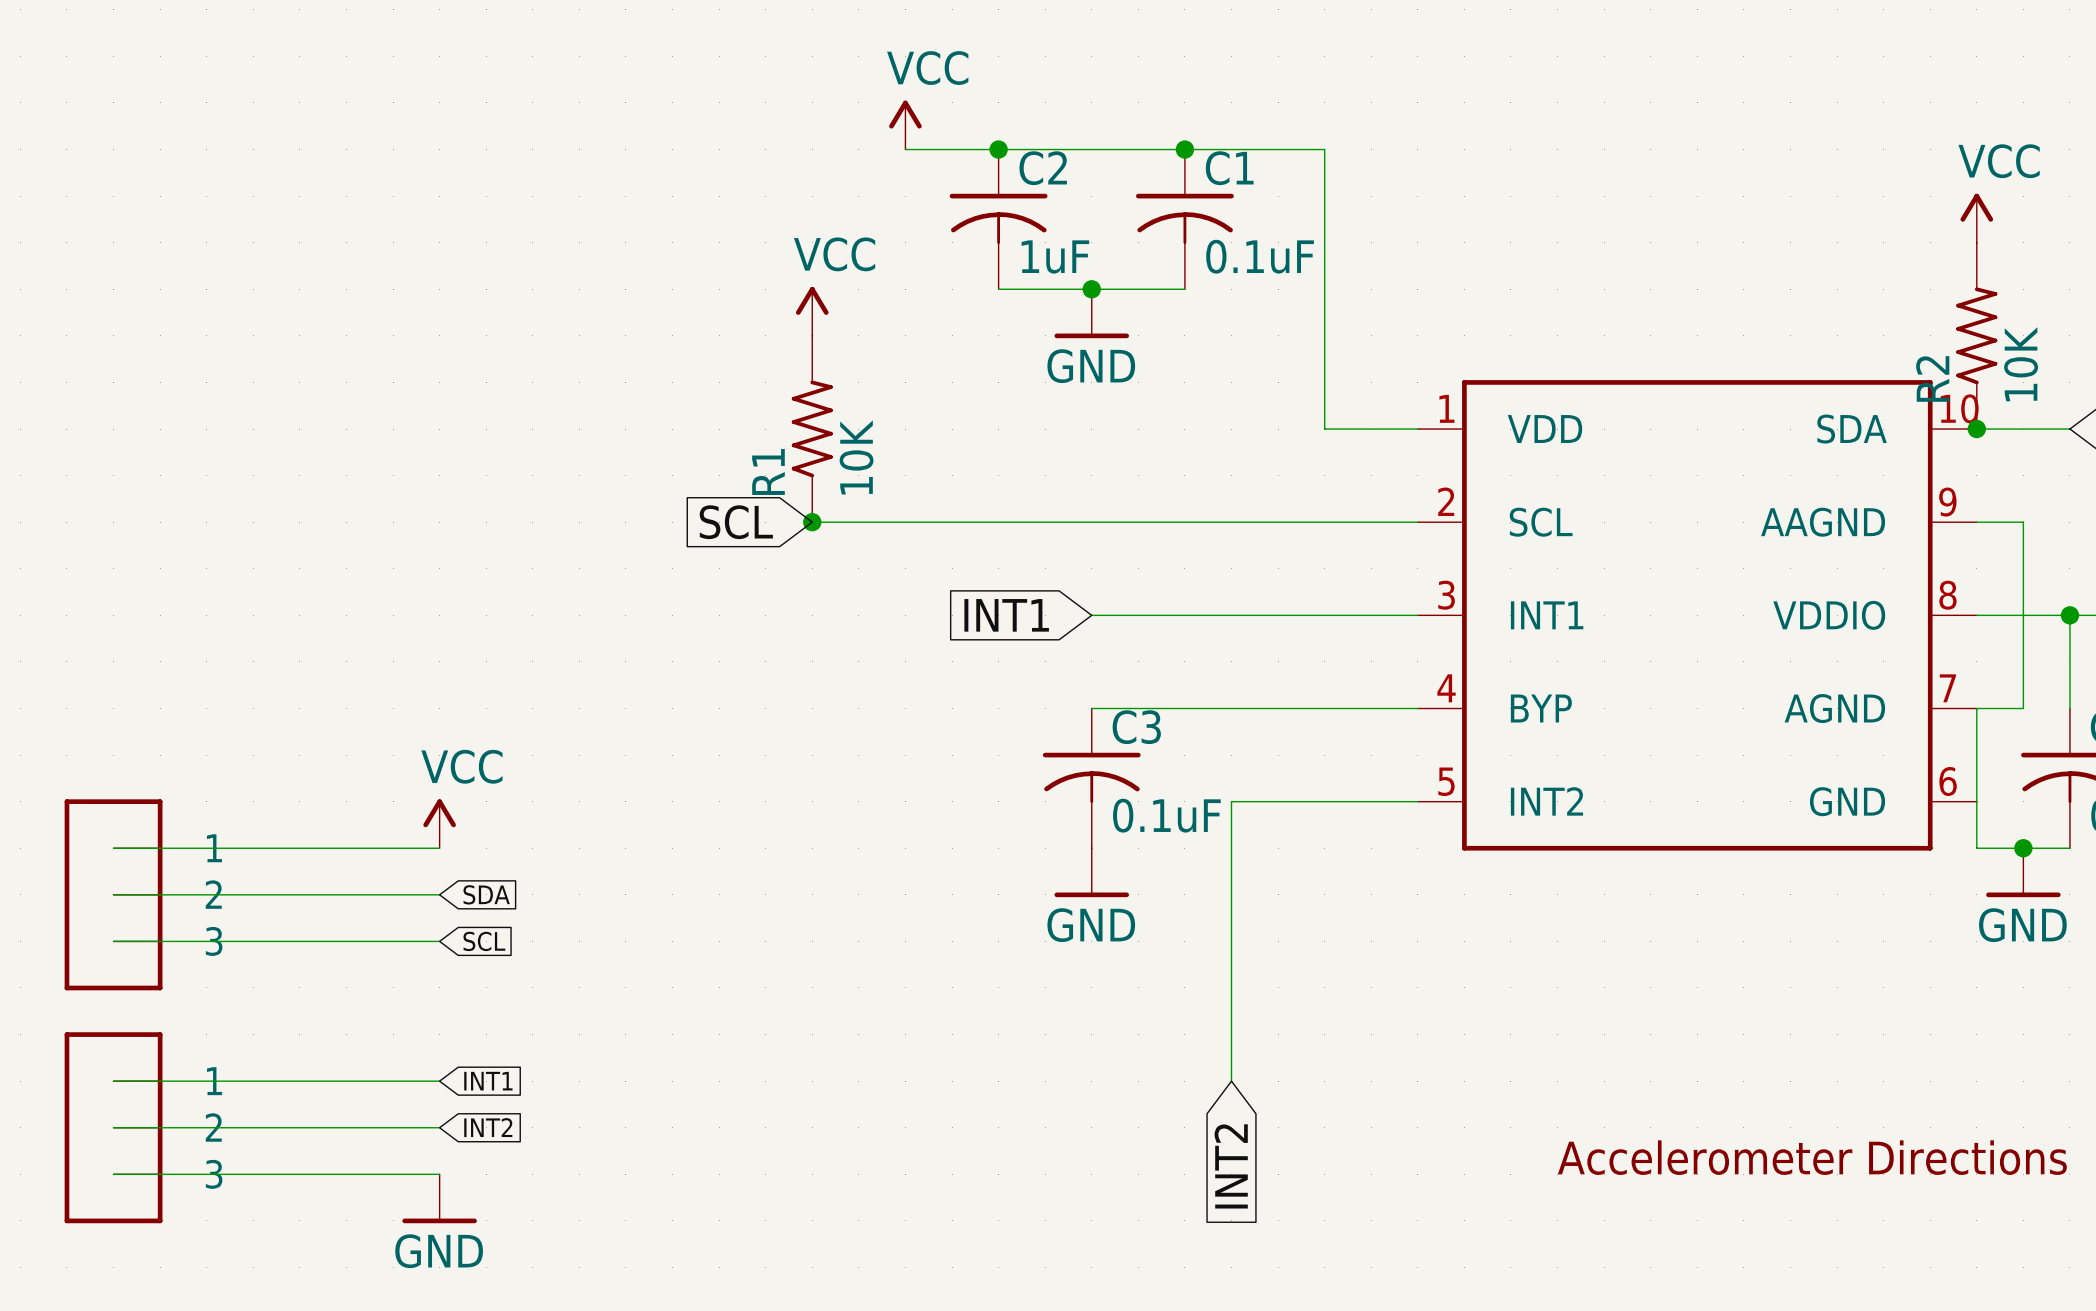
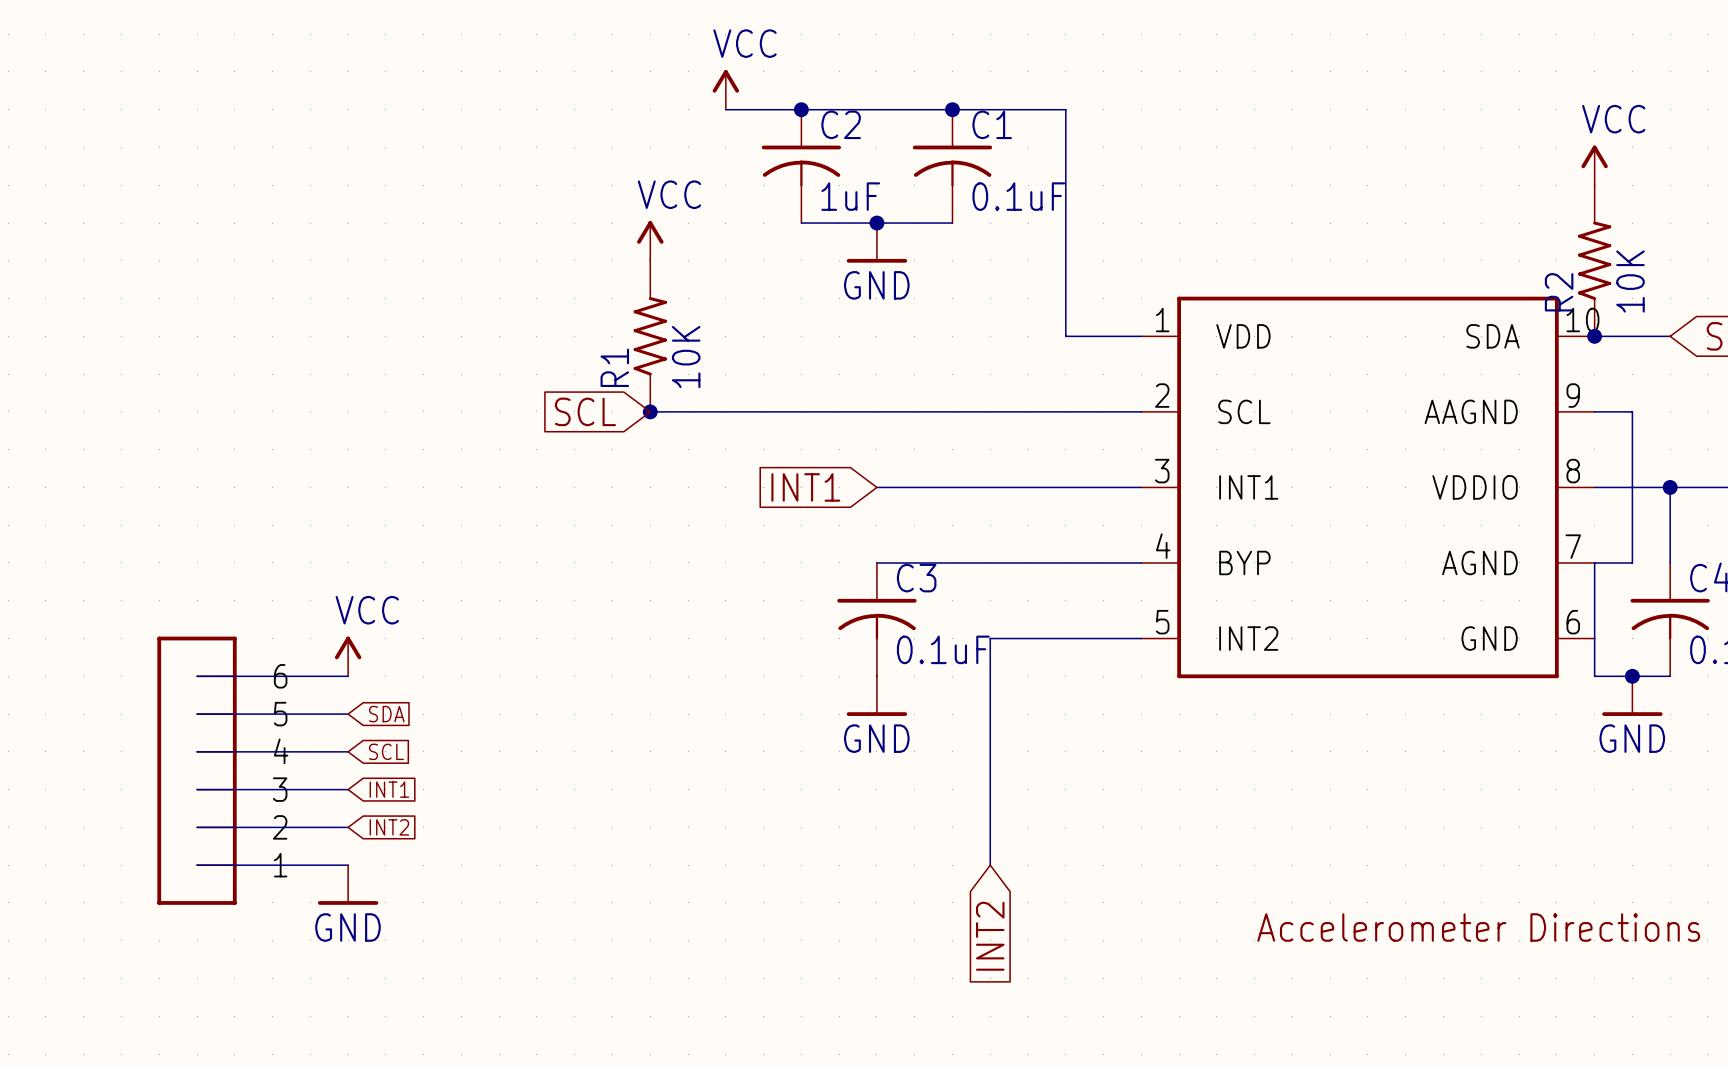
wire: (113, 848) (253, 848) -> none
wire: (113, 894) (253, 894) -> none
part: (113, 894) -> none
wire: (113, 941) (253, 941) -> none
part: none -> (197, 770)
wire: none -> (197, 789) (348, 789)
wire: none -> (197, 827) (348, 827)
wire: (113, 1081) (253, 1081) -> none
global label position: INT1 (488, 1081) -> INT1 (389, 789)
wire: (113, 1127) (439, 1127) -> none
part: (113, 1127) -> none
global label position: INT2 (488, 1127) -> INT2 (389, 827)
wire: (113, 1174) (439, 1174) -> none
power symbol position: GND (439, 1198) -> GND (348, 885)

